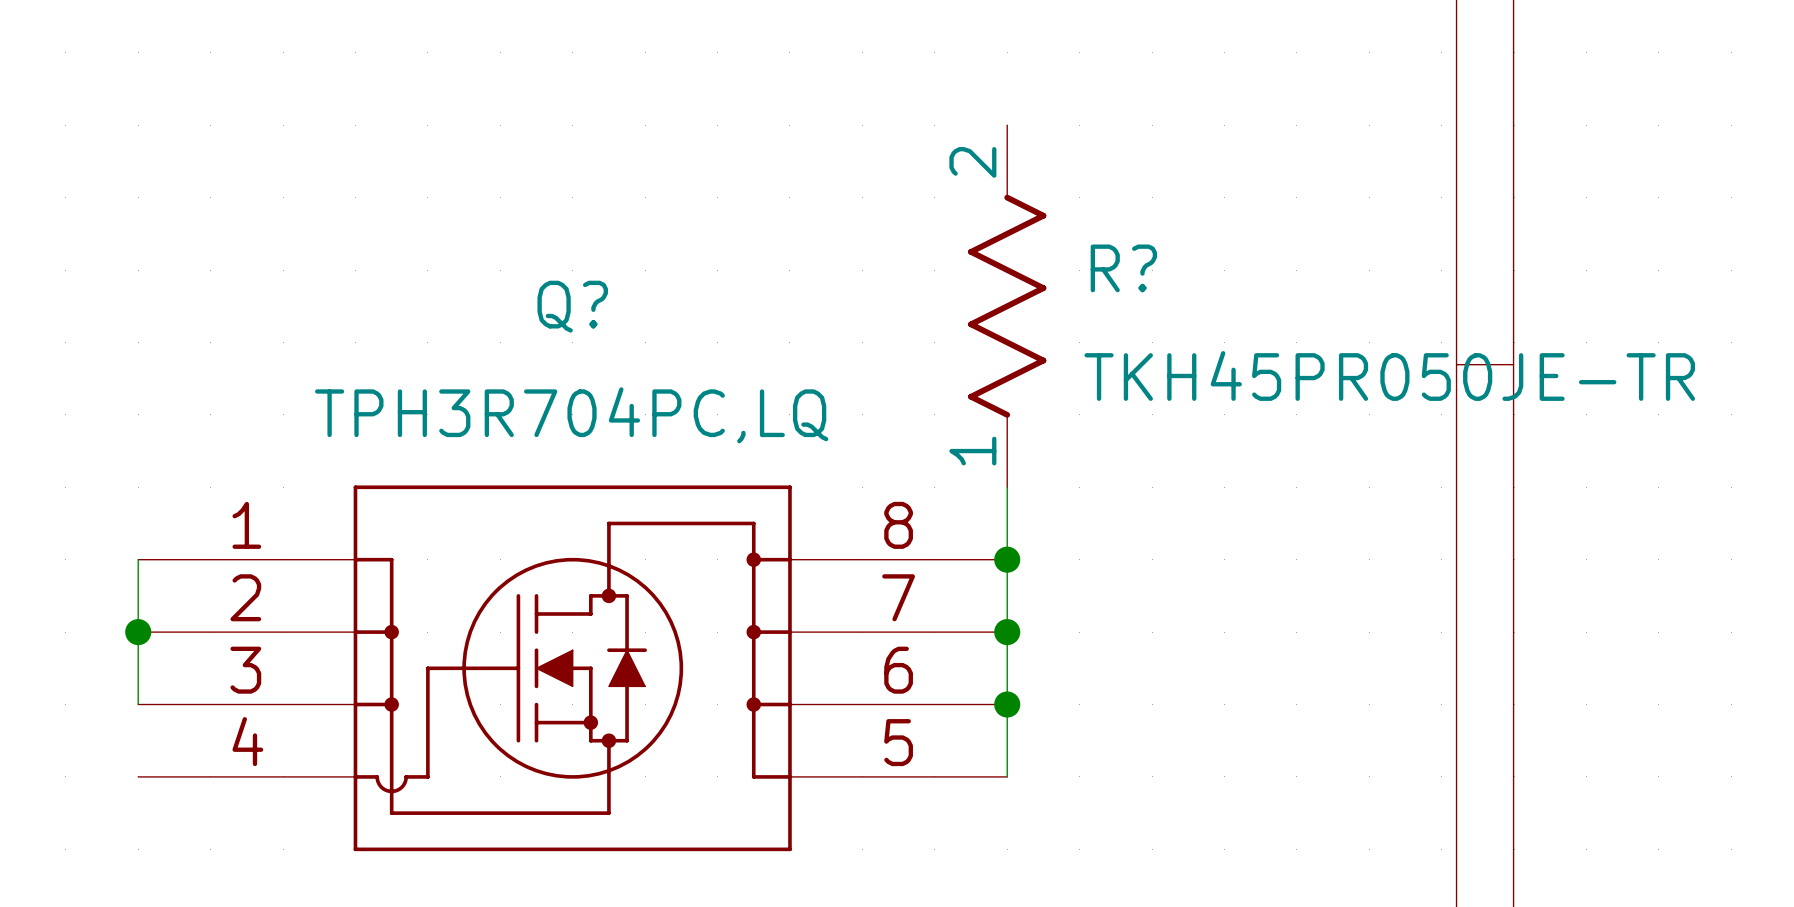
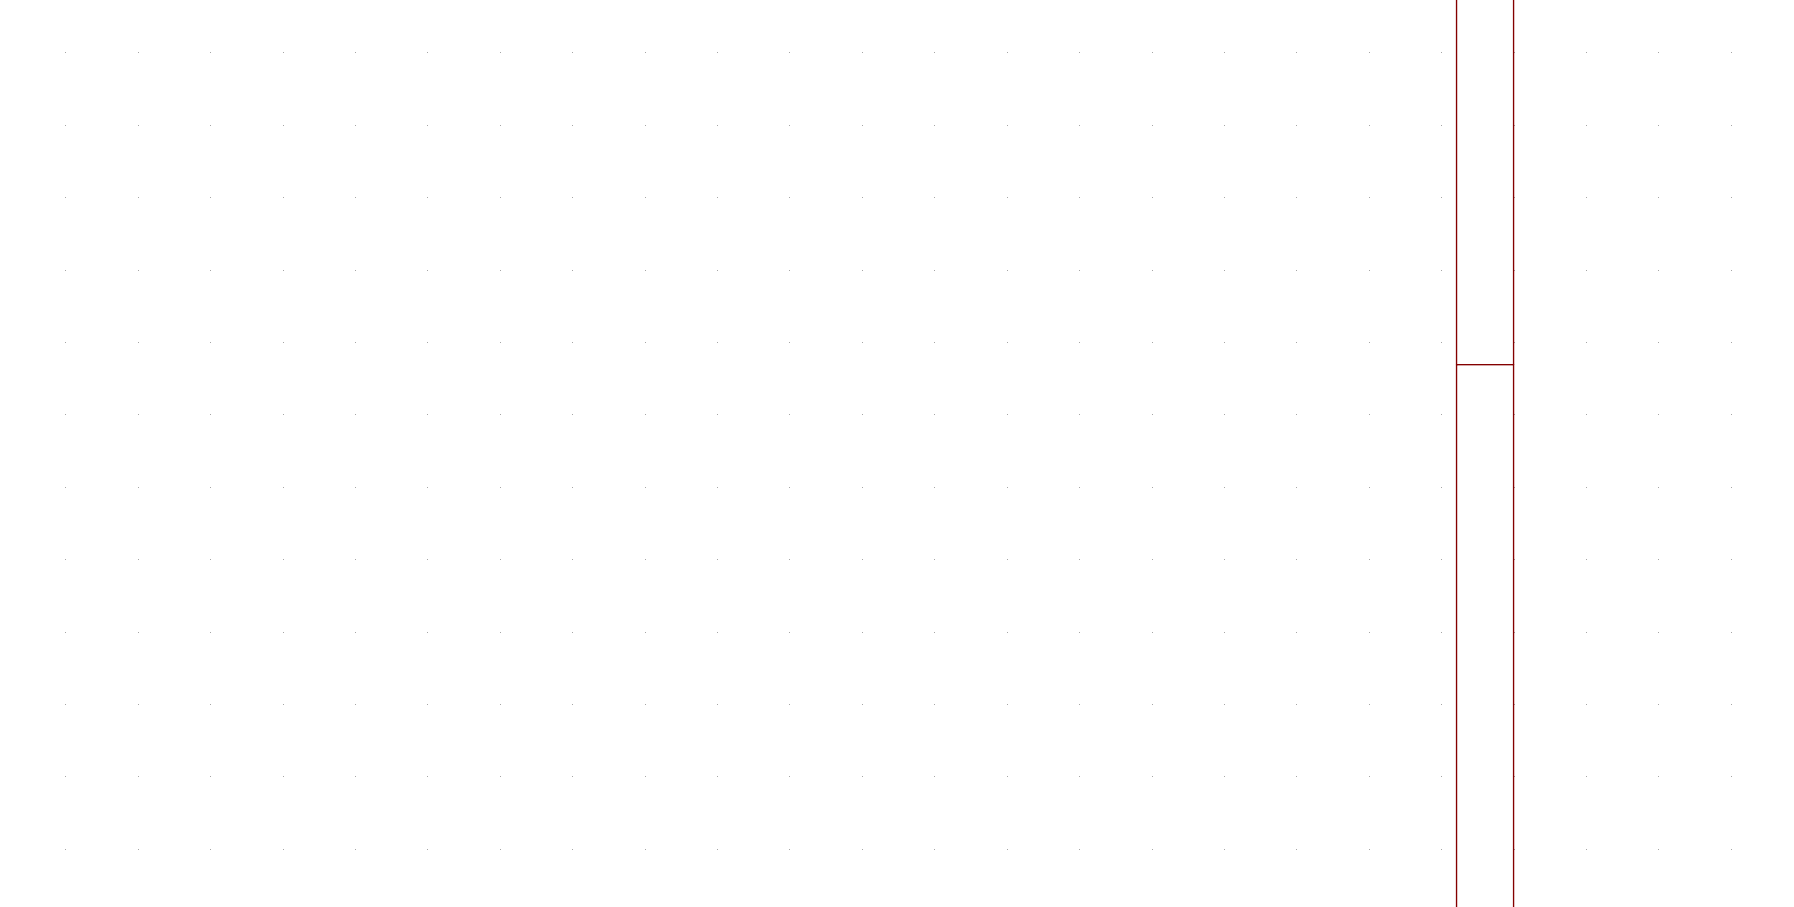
R?: TKH45PR050JE-TR (1007, 306) -> none
wire: (1007, 487) (1007, 776) -> none
wire: (138, 559) (138, 704) -> none
junction: (1007, 559) -> none
junction: (138, 632) -> none
junction: (1007, 632) -> none
Q?: TPH3R704PC,LQ (572, 668) -> none
junction: (1007, 704) -> none

